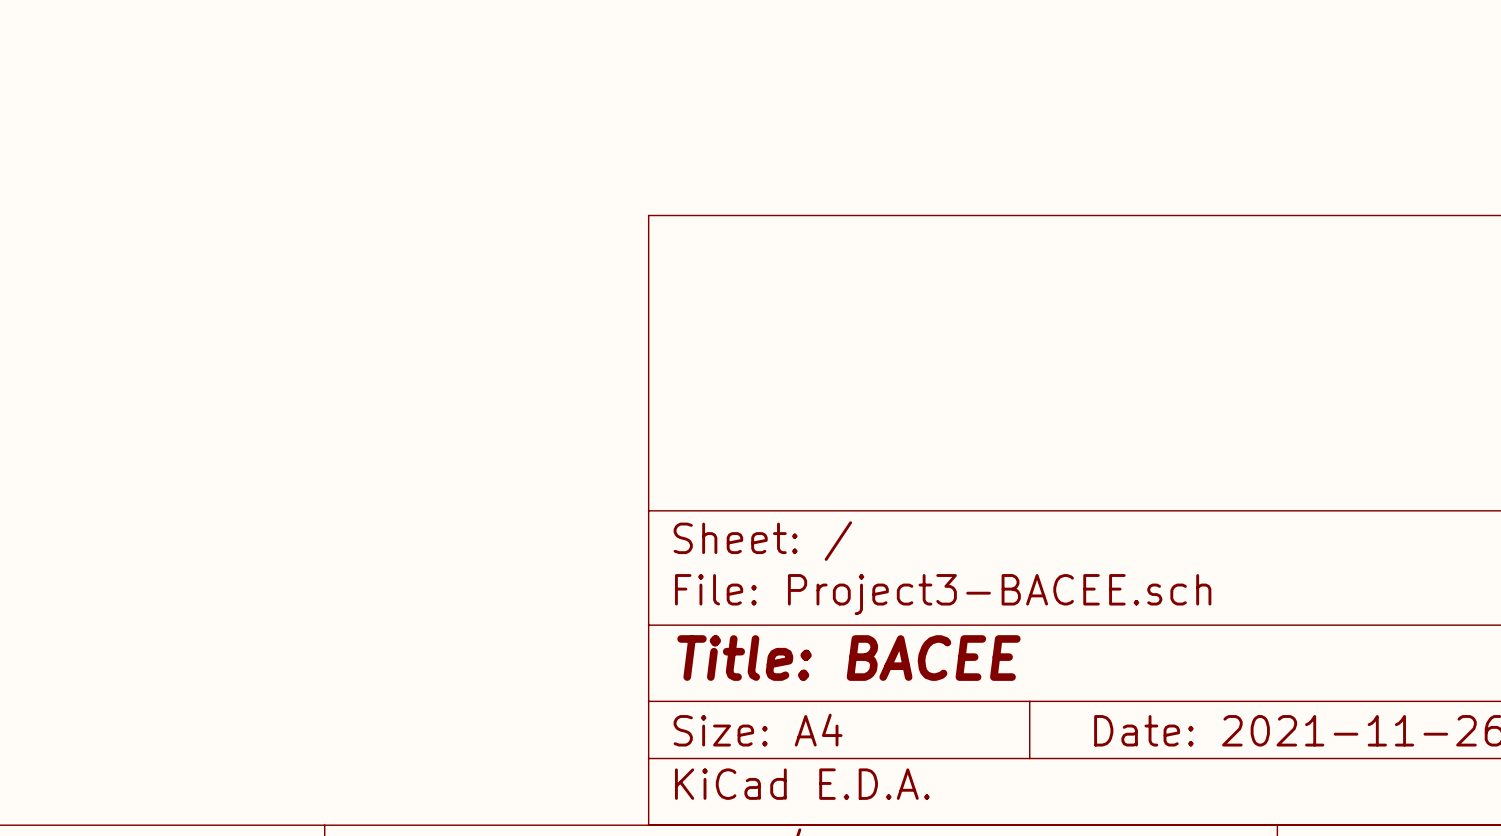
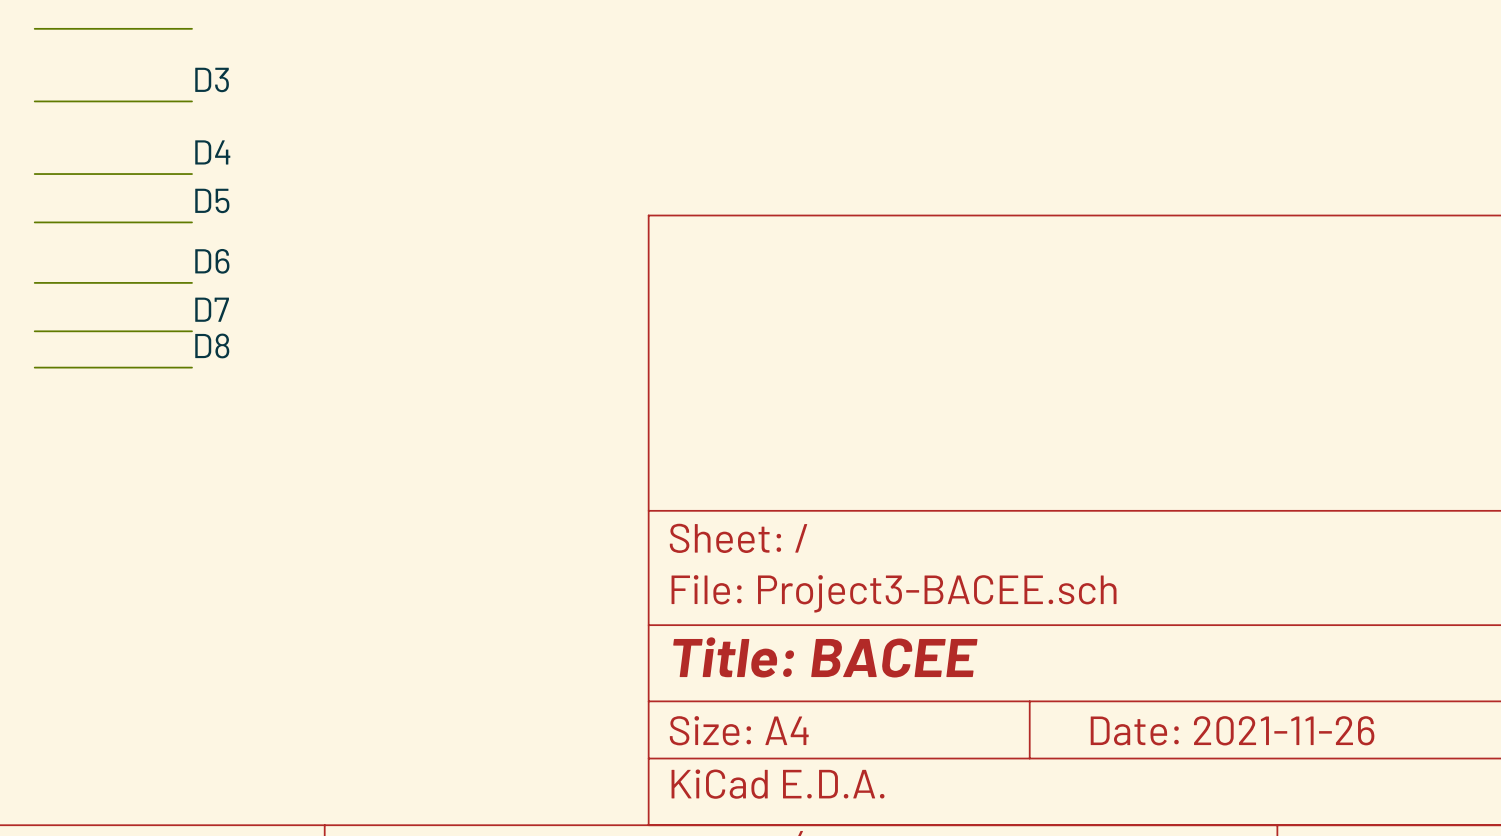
wire: none -> (34, 28) (192, 28)
label: none -> D3 (212, 79)
wire: none -> (34, 101) (192, 101)
label: none -> D4 (212, 152)
wire: none -> (34, 174) (192, 174)
label: none -> D5 (212, 200)
wire: none -> (34, 222) (192, 222)
label: none -> D6 (212, 261)
wire: none -> (34, 282) (192, 282)
label: none -> D7 (212, 309)
wire: none -> (34, 331) (192, 331)
label: none -> D8 (212, 345)
wire: none -> (34, 367) (192, 367)

